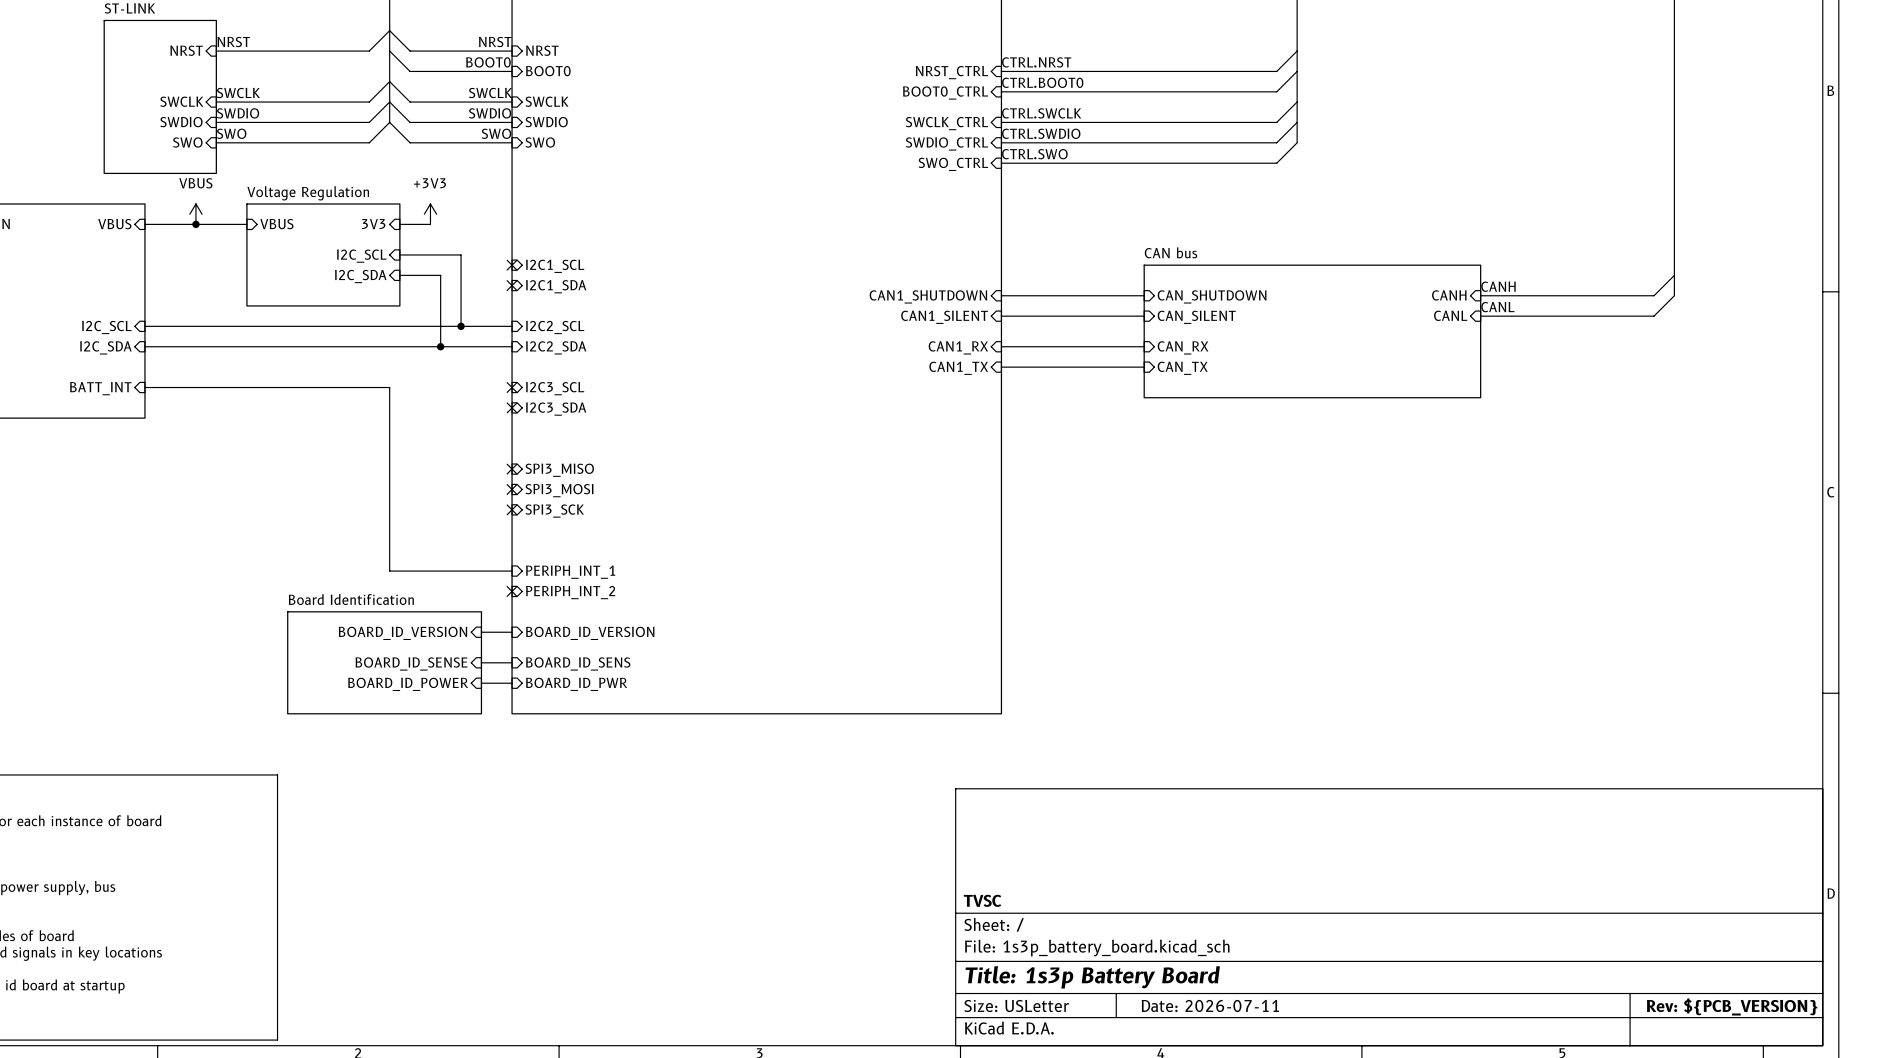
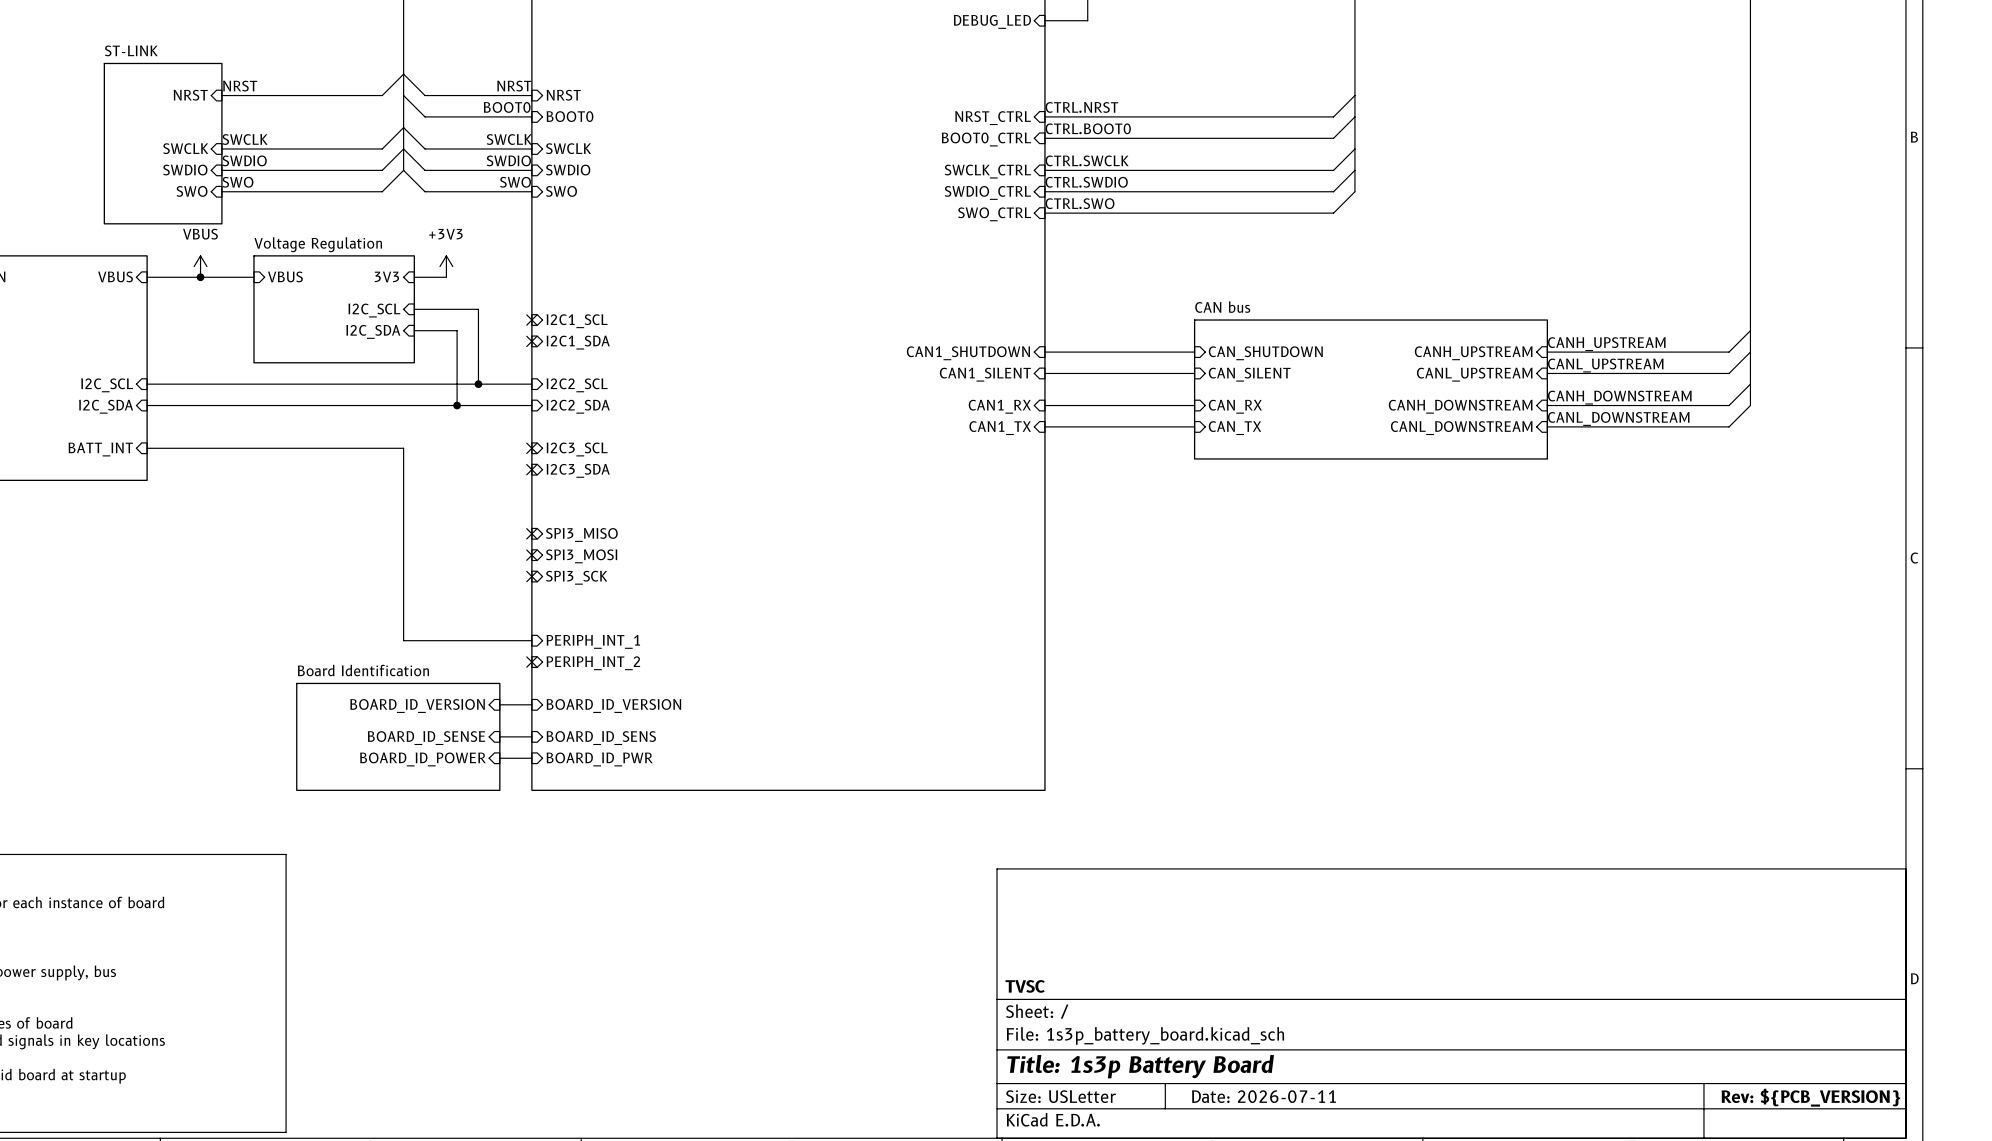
label: CANH (1498, 286) -> CANH_UPSTREAM (1606, 344)
sheet pin: CANH (1449, 295) -> CANH_UPSTREAM (1473, 353)
bus: none -> (1750, 352) (1750, 405)
label: CANL (1497, 307) -> CANL_UPSTREAM (1605, 365)
sheet pin: CANL (1450, 315) -> CANL_UPSTREAM (1474, 374)
wire: none -> (1750, 384) (1729, 405) (1547, 405)
label: none -> CANH_DOWNSTREAM (1619, 397)
wire: none -> (1750, 405) (1729, 426) (1547, 426)
sheet pin: none -> CANH_DOWNSTREAM (1460, 406)
label: none -> CANL_DOWNSTREAM (1618, 418)
sheet pin: none -> CANL_DOWNSTREAM (1461, 428)

